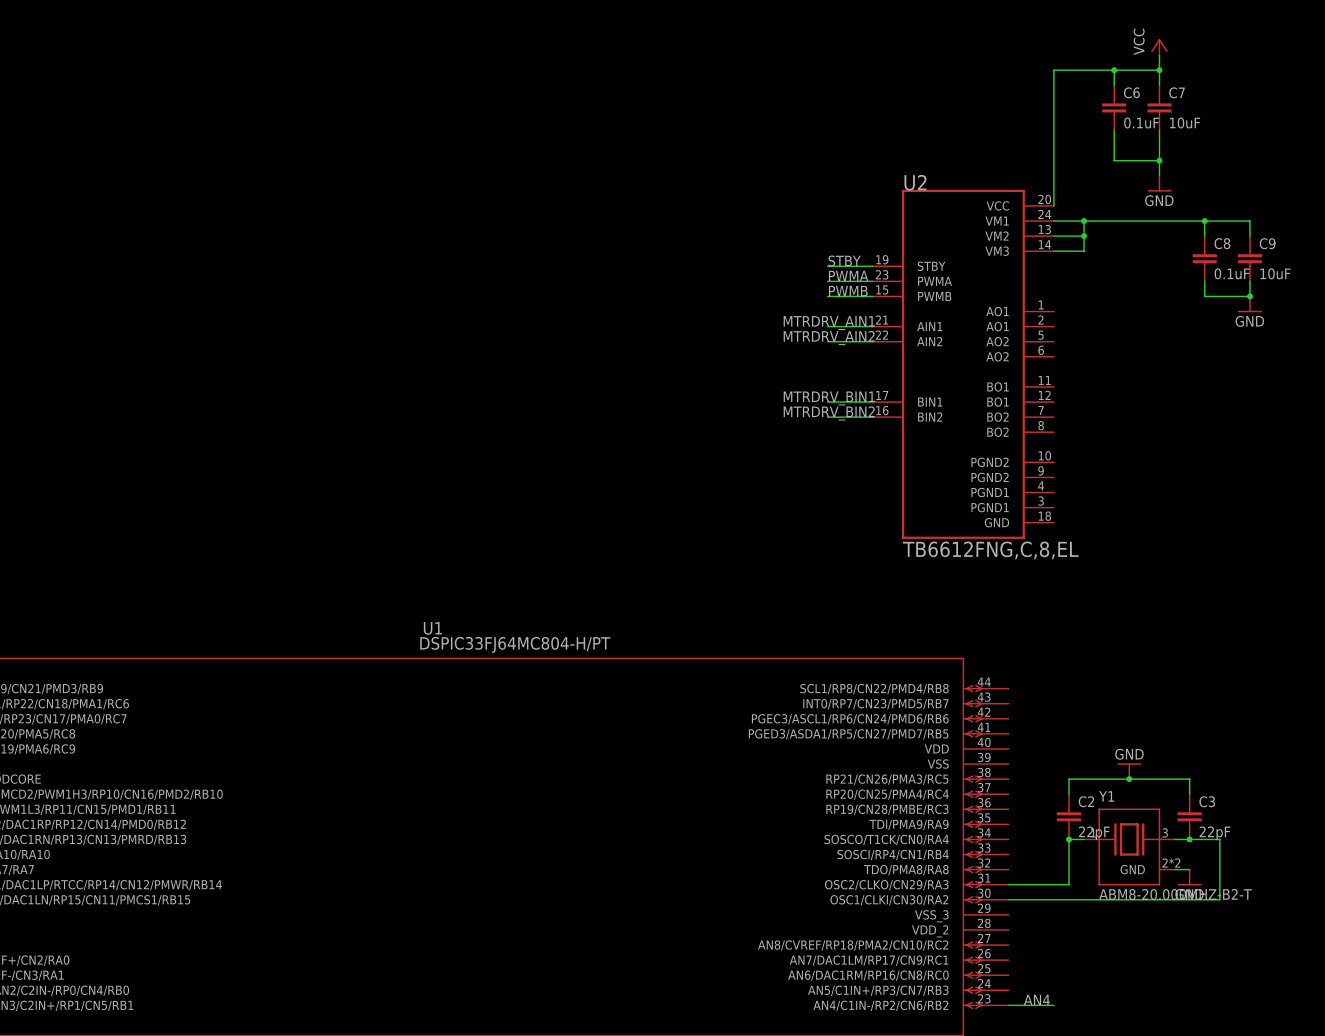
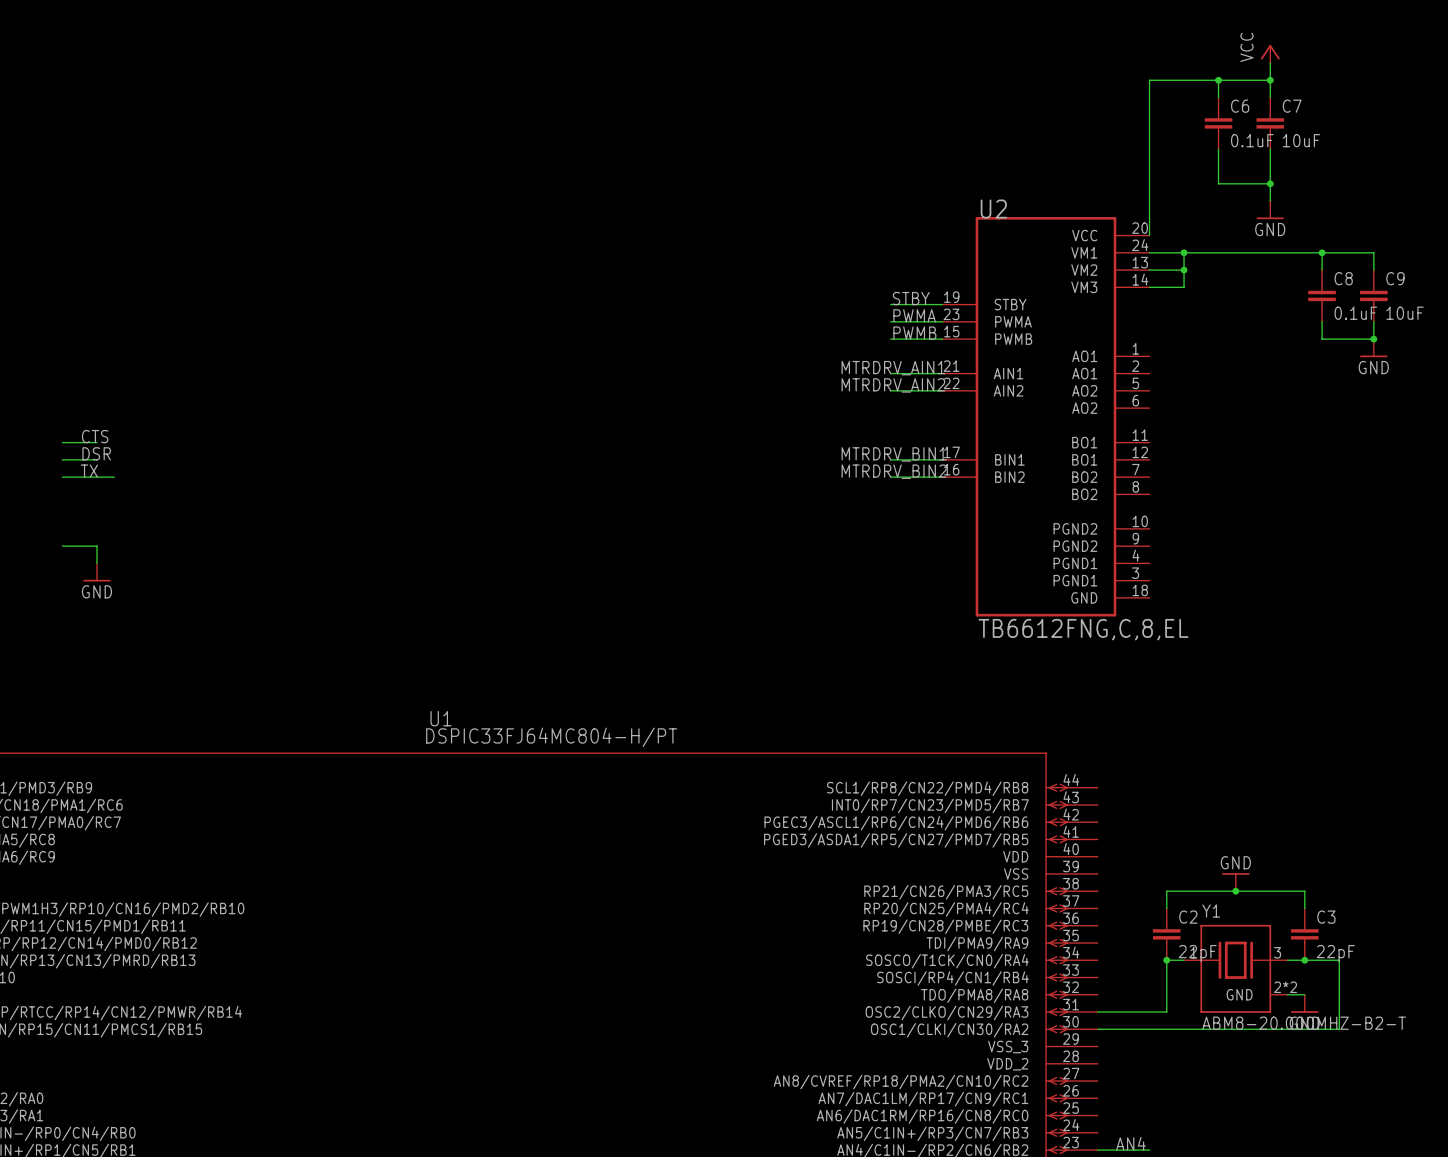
label: none -> CTS (95, 436)
wire: none -> (62, 442) (97, 442)
label: none -> DSR (96, 453)
wire: none -> (62, 459) (97, 459)
label: none -> TX (89, 471)
wire: none -> (62, 477) (114, 477)
wire: none -> (62, 546) (97, 546) (97, 563)
power symbol: none -> GND (97, 572)

